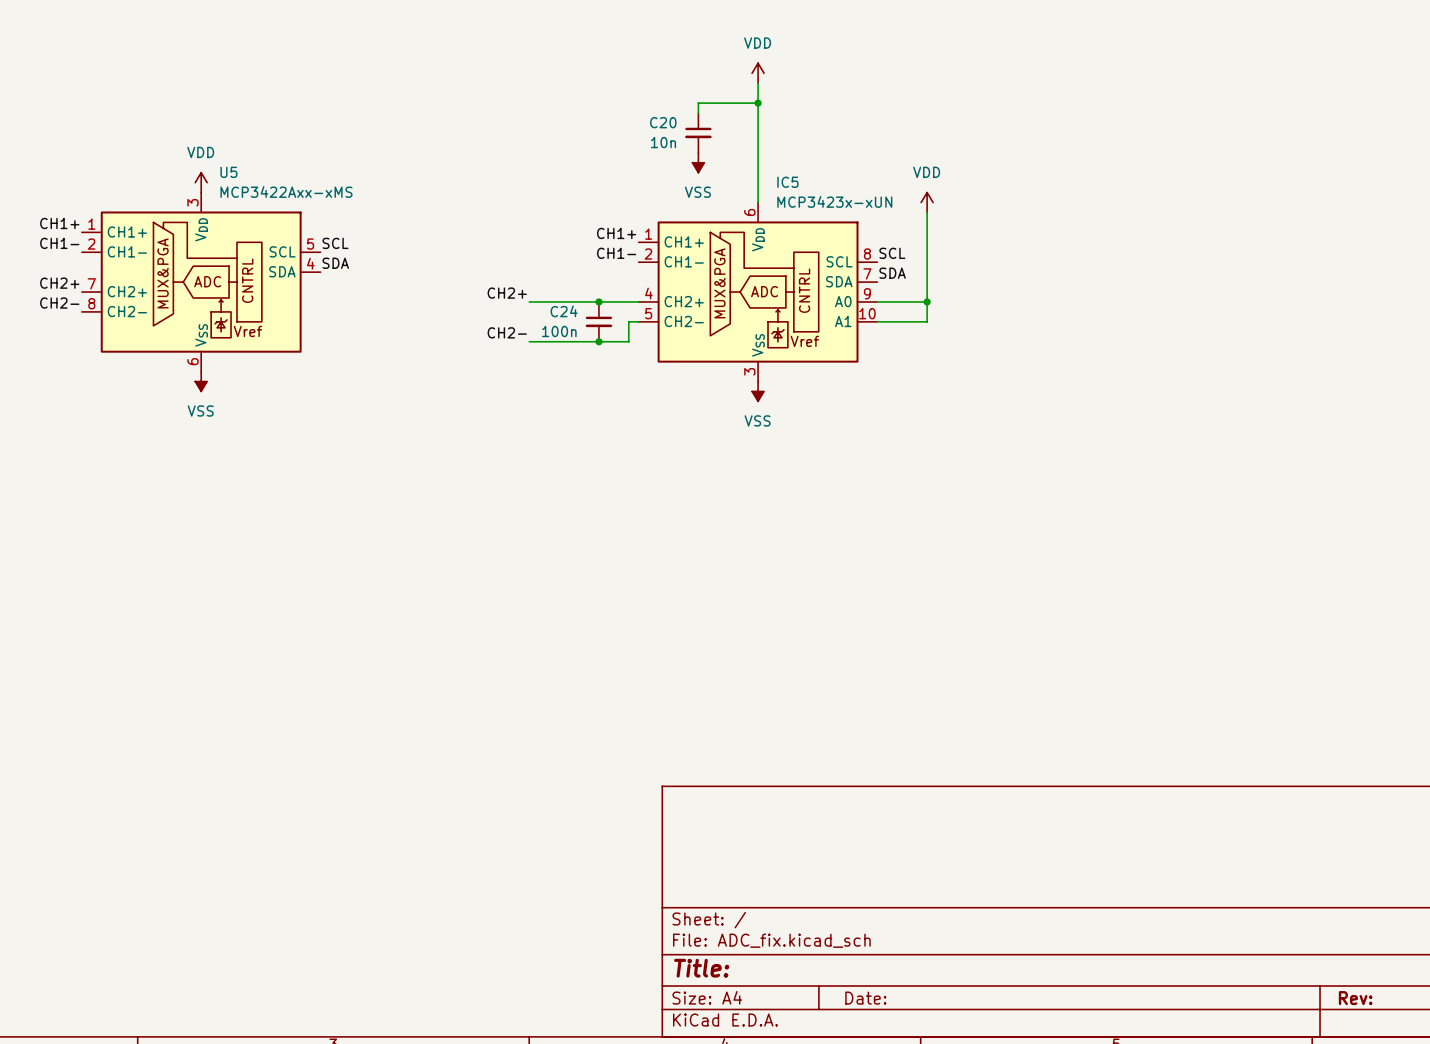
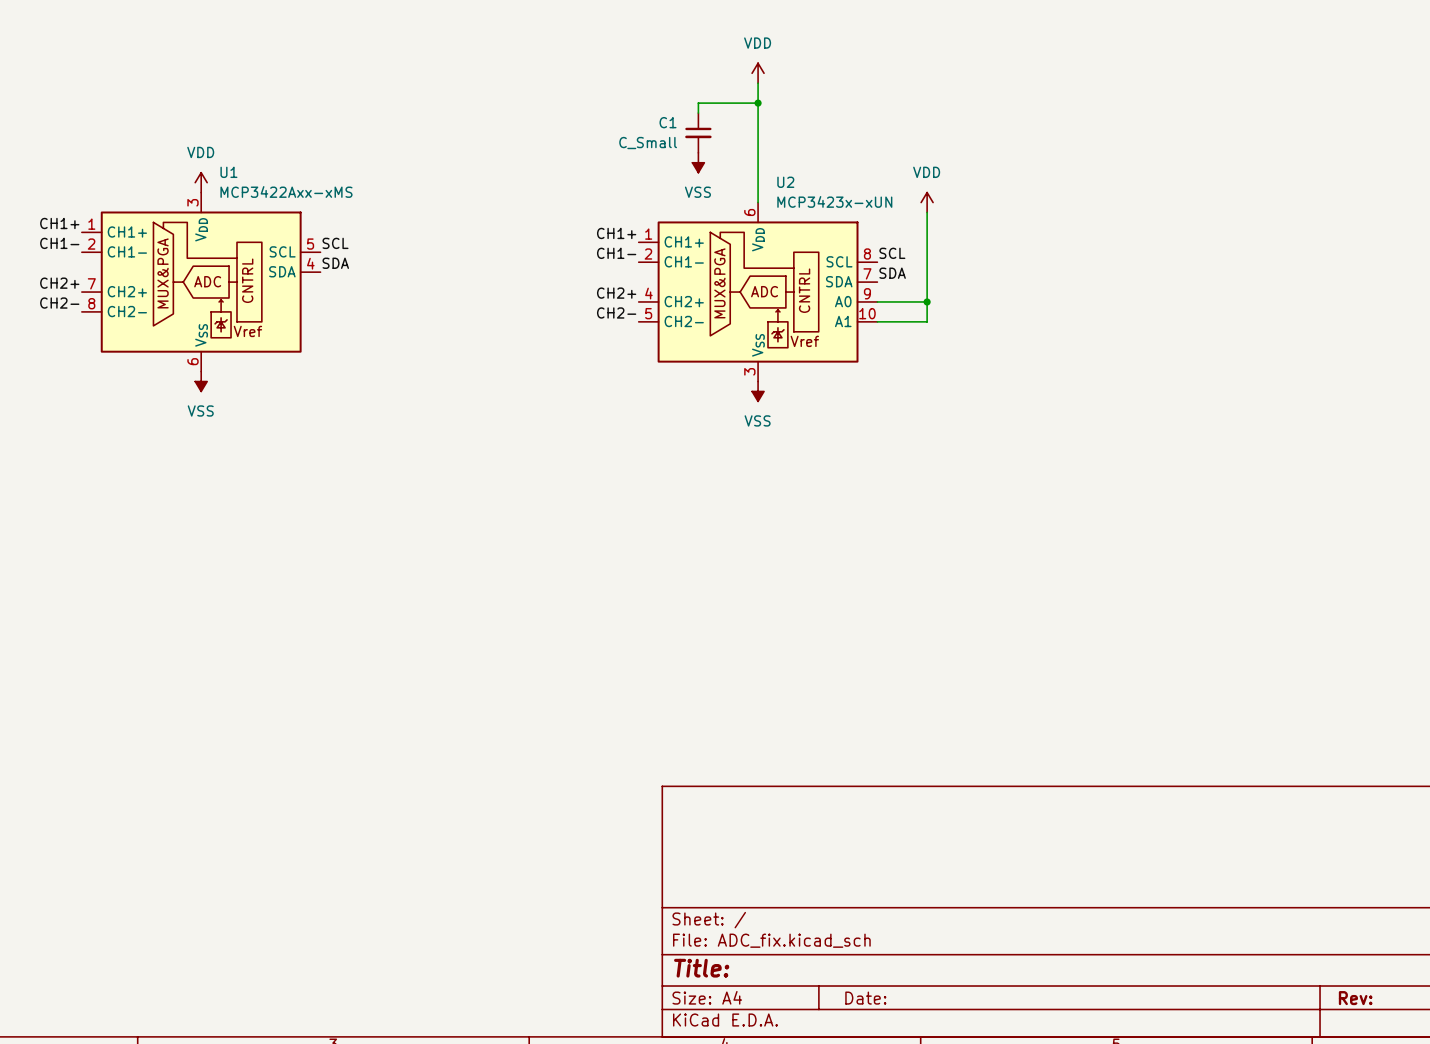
C20 name: C20 (663, 122) -> C1 (668, 122)
C20 value: 10n (663, 142) -> C_Small (648, 143)
U5 name: U5 (228, 172) -> U1 (228, 172)
IC5 name: IC5 (787, 182) -> U2 (785, 182)
label position: CH2+ (507, 293) -> CH2+ (616, 293)
wire: (529, 301) (638, 301) -> none
junction: (598, 301) -> none
C24: 100n (598, 321) -> none
wire: (638, 321) (628, 321) (628, 341) (529, 341) -> none
label position: CH2- (507, 332) -> CH2- (616, 312)
junction: (598, 341) -> none

